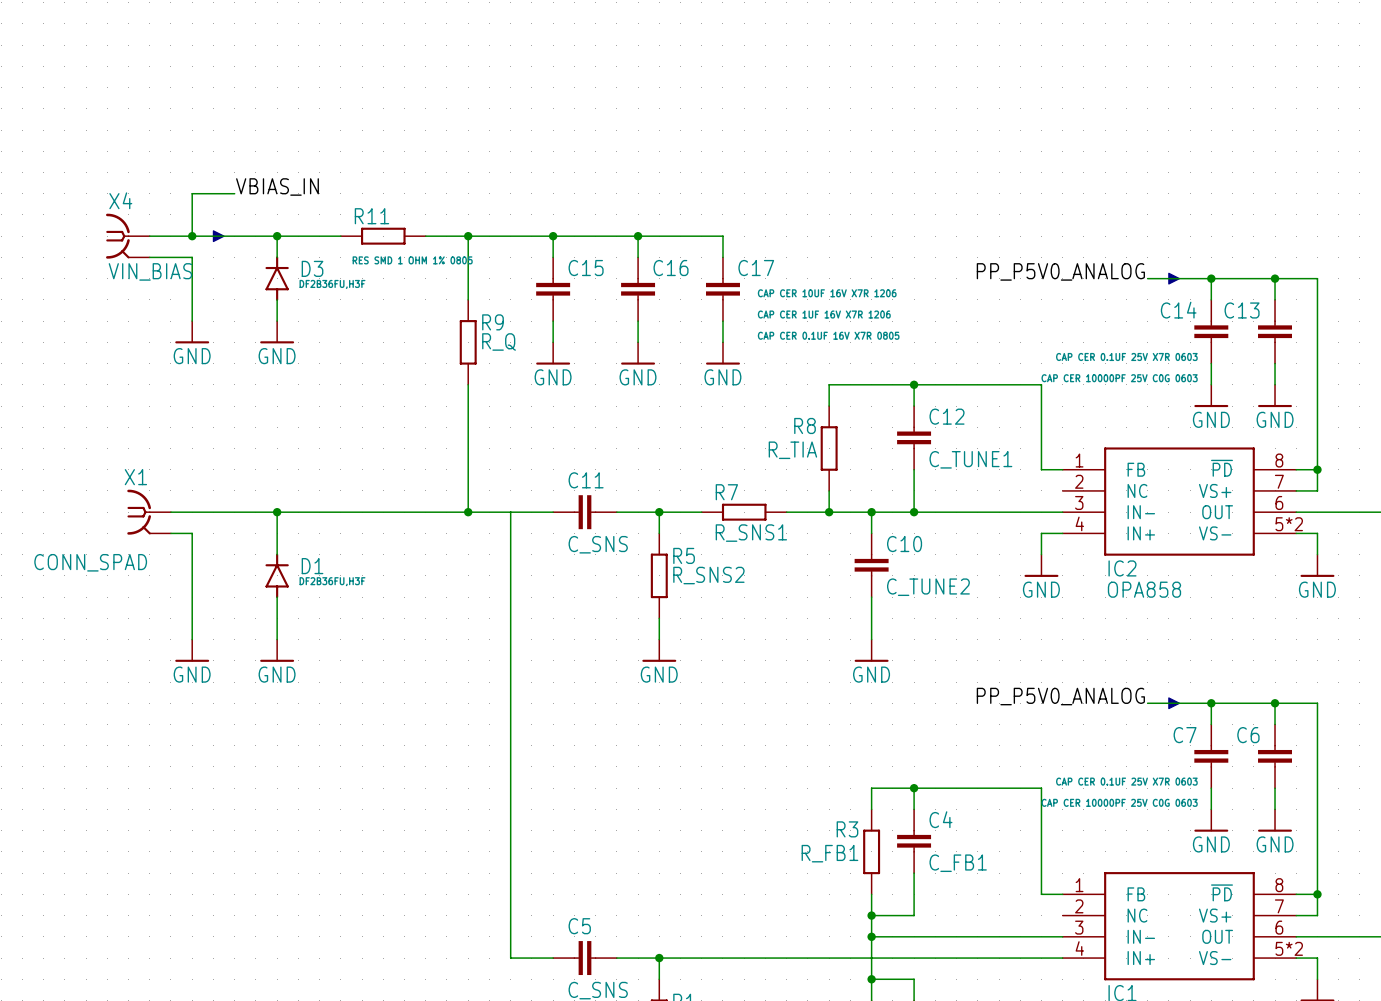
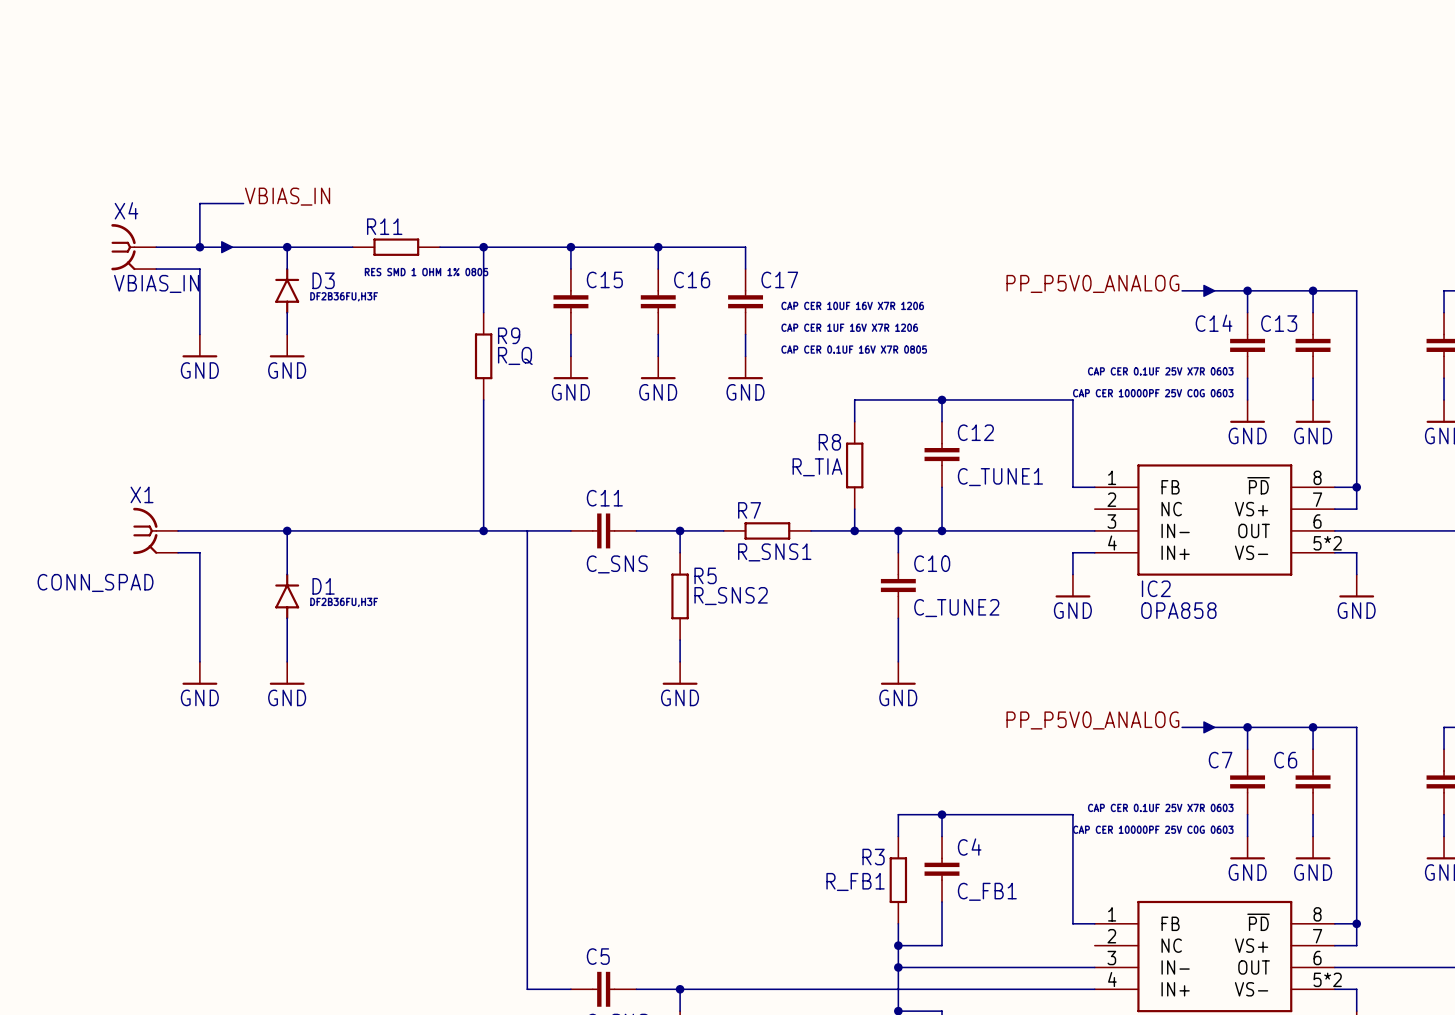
X4 value: VIN_BIAS (150, 271) -> VBIAS_IN (156, 283)

